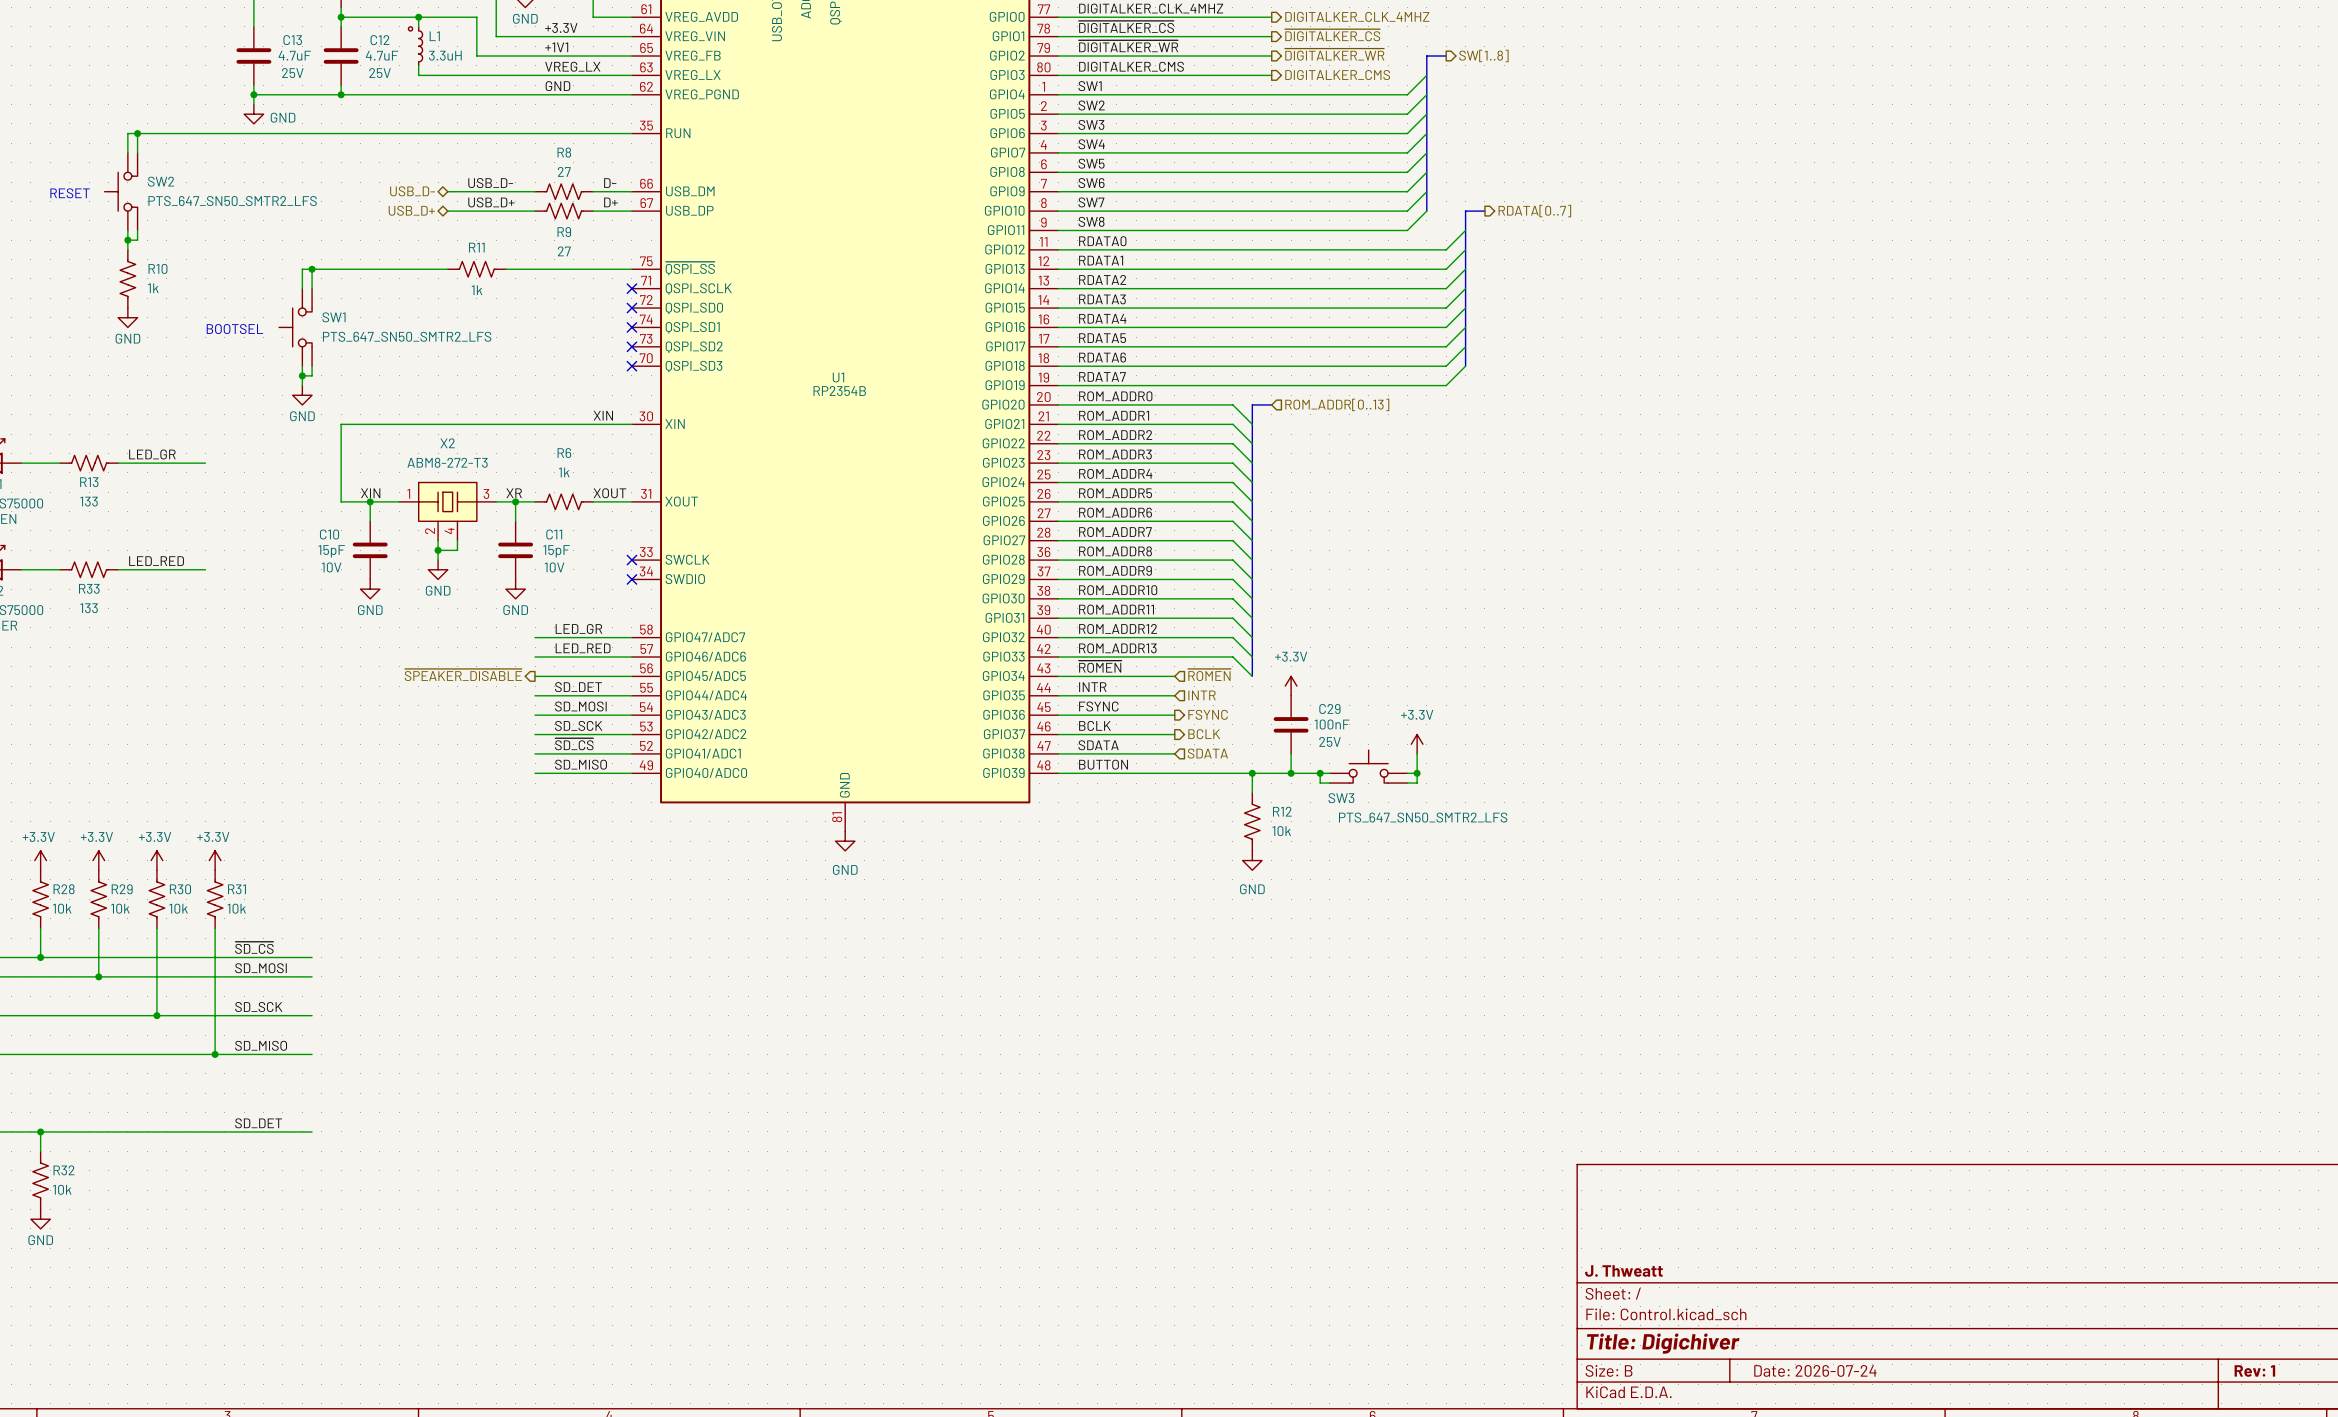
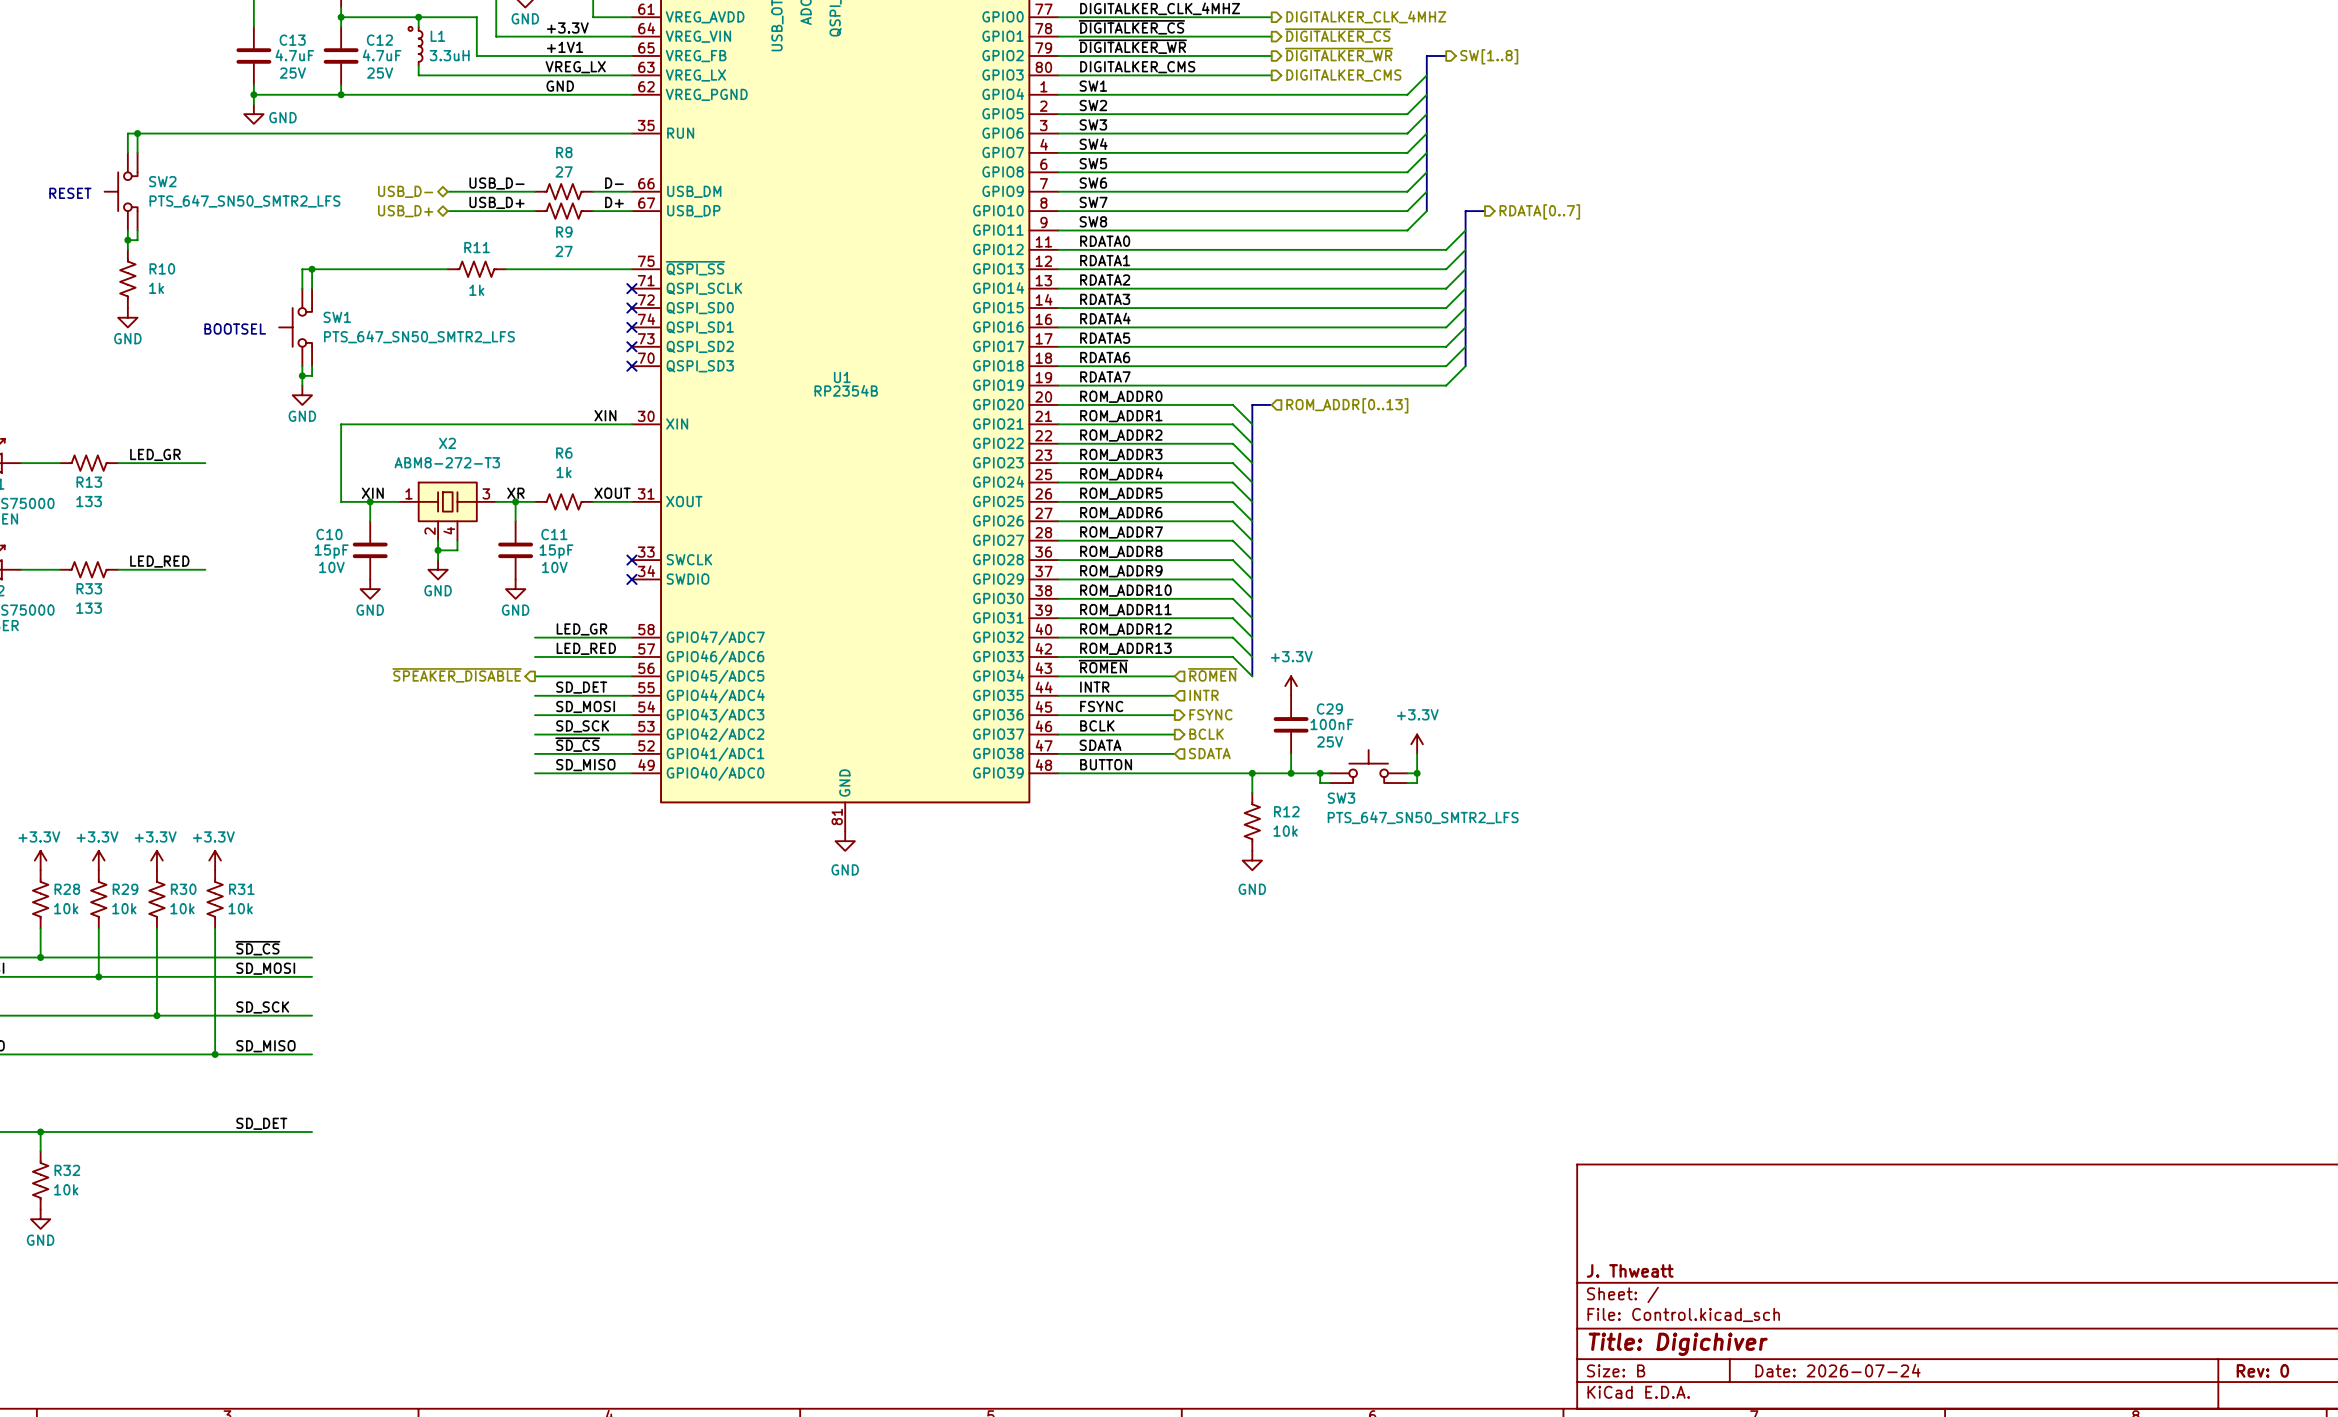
title block: Rev: 1 (2254, 1370) -> Rev: 0 (2262, 1370)

